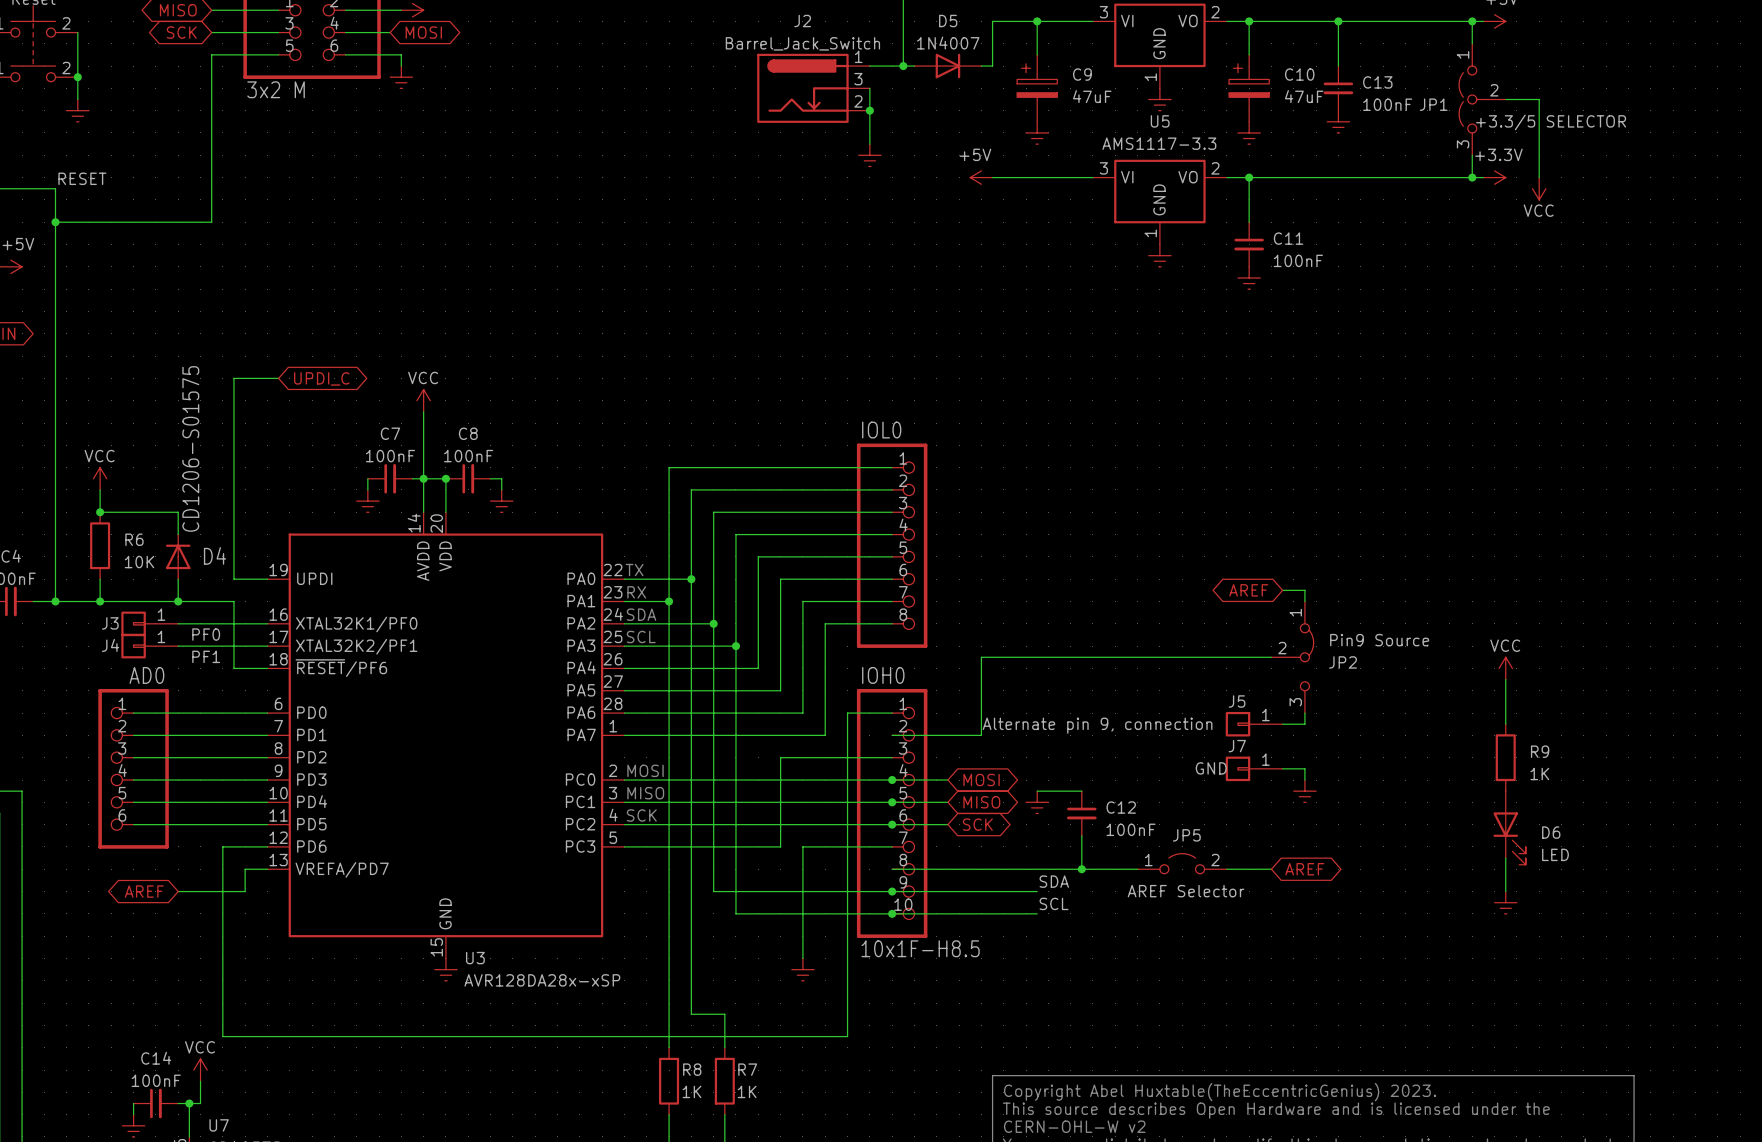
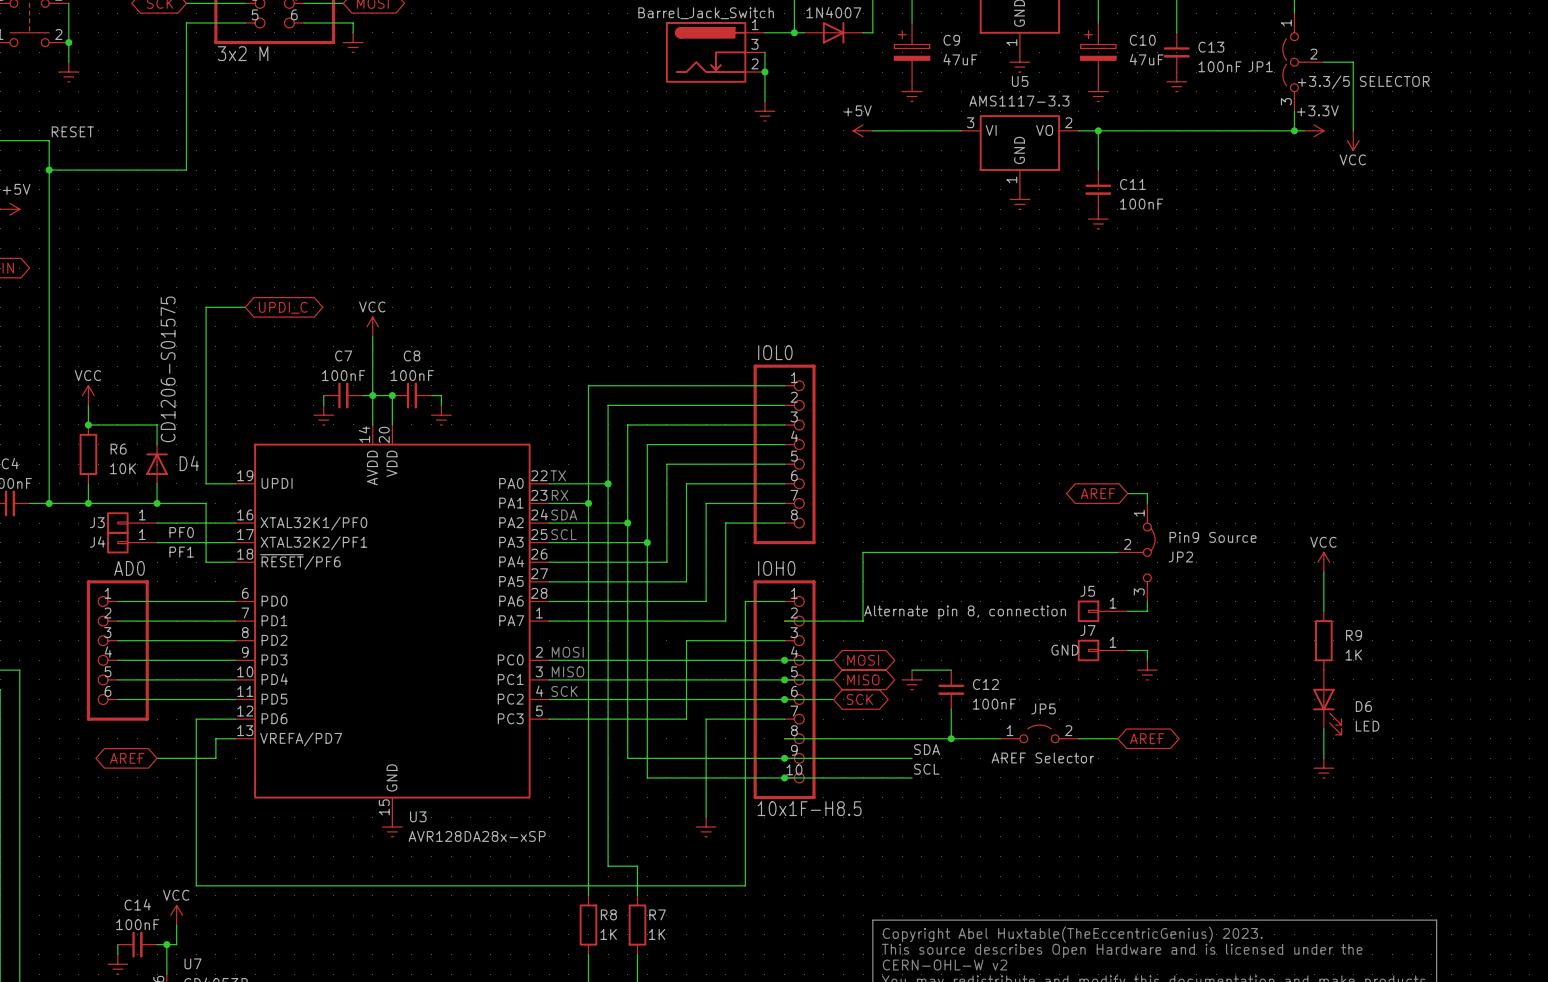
J5 value: Alternate pin 9, connection (1097, 725) -> Alternate pin 8, connection (965, 612)

